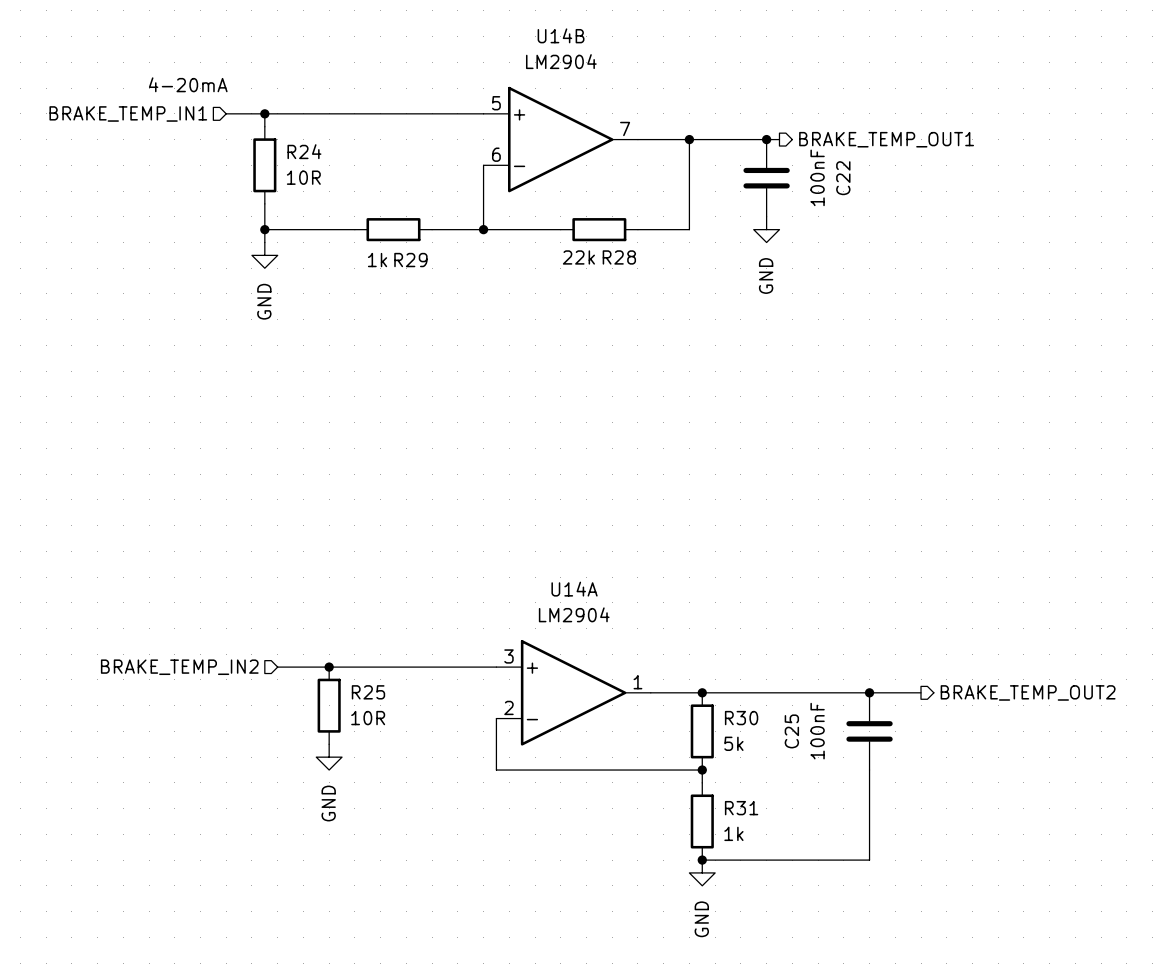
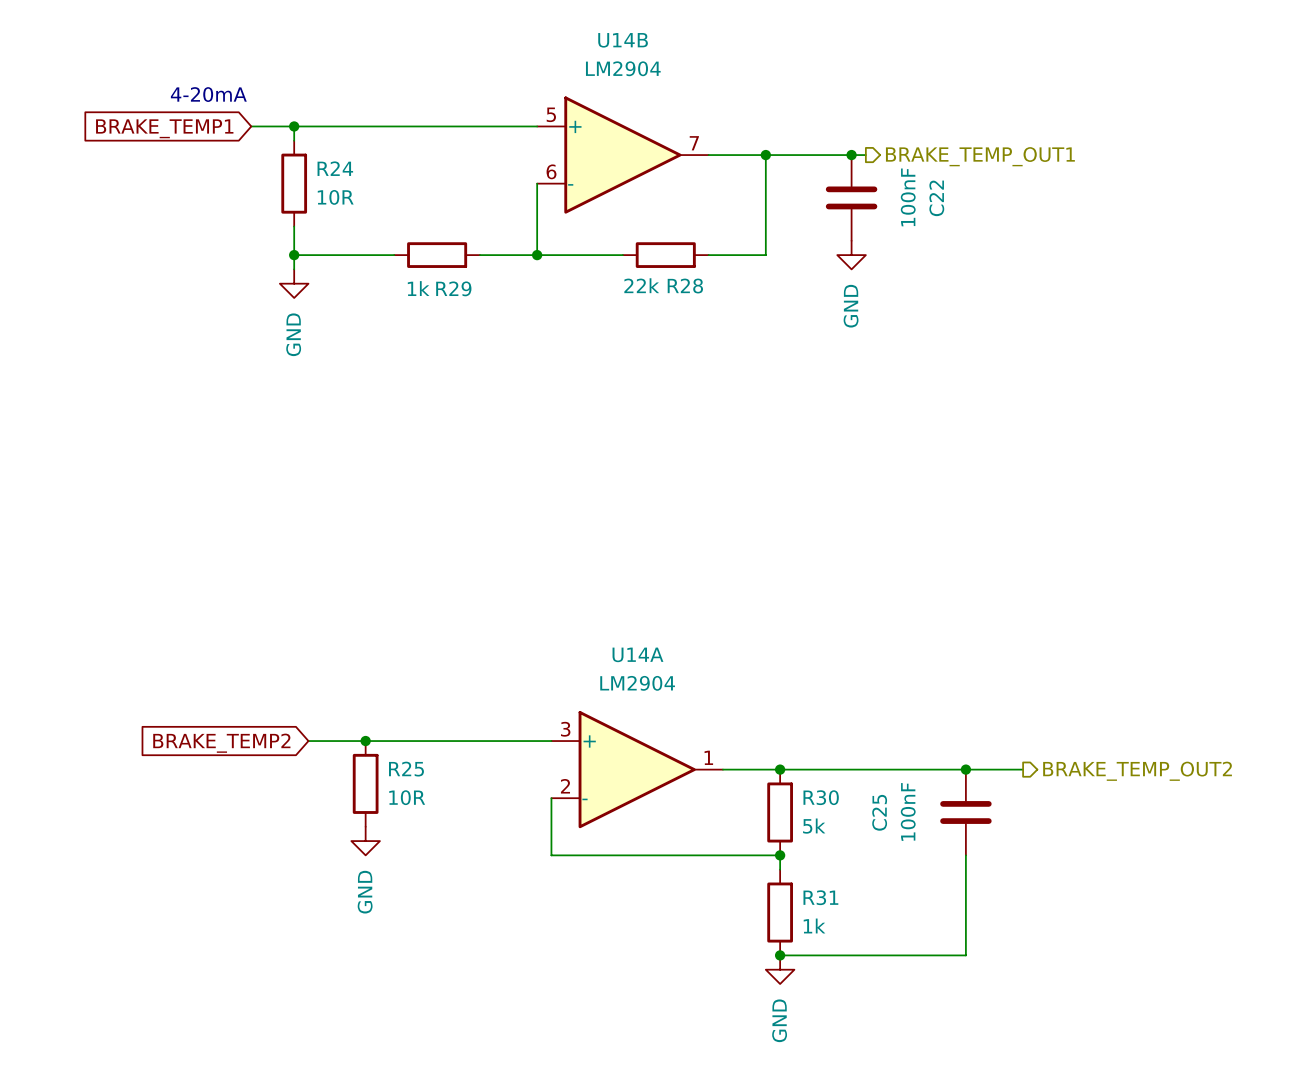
hierarchical label: BRAKE_TEMP_IN1 (128, 113) -> none
global label: none -> BRAKE_TEMP1 (164, 128)
hierarchical label: BRAKE_TEMP_IN2 (179, 667) -> none
global label: none -> BRAKE_TEMP2 (221, 743)

